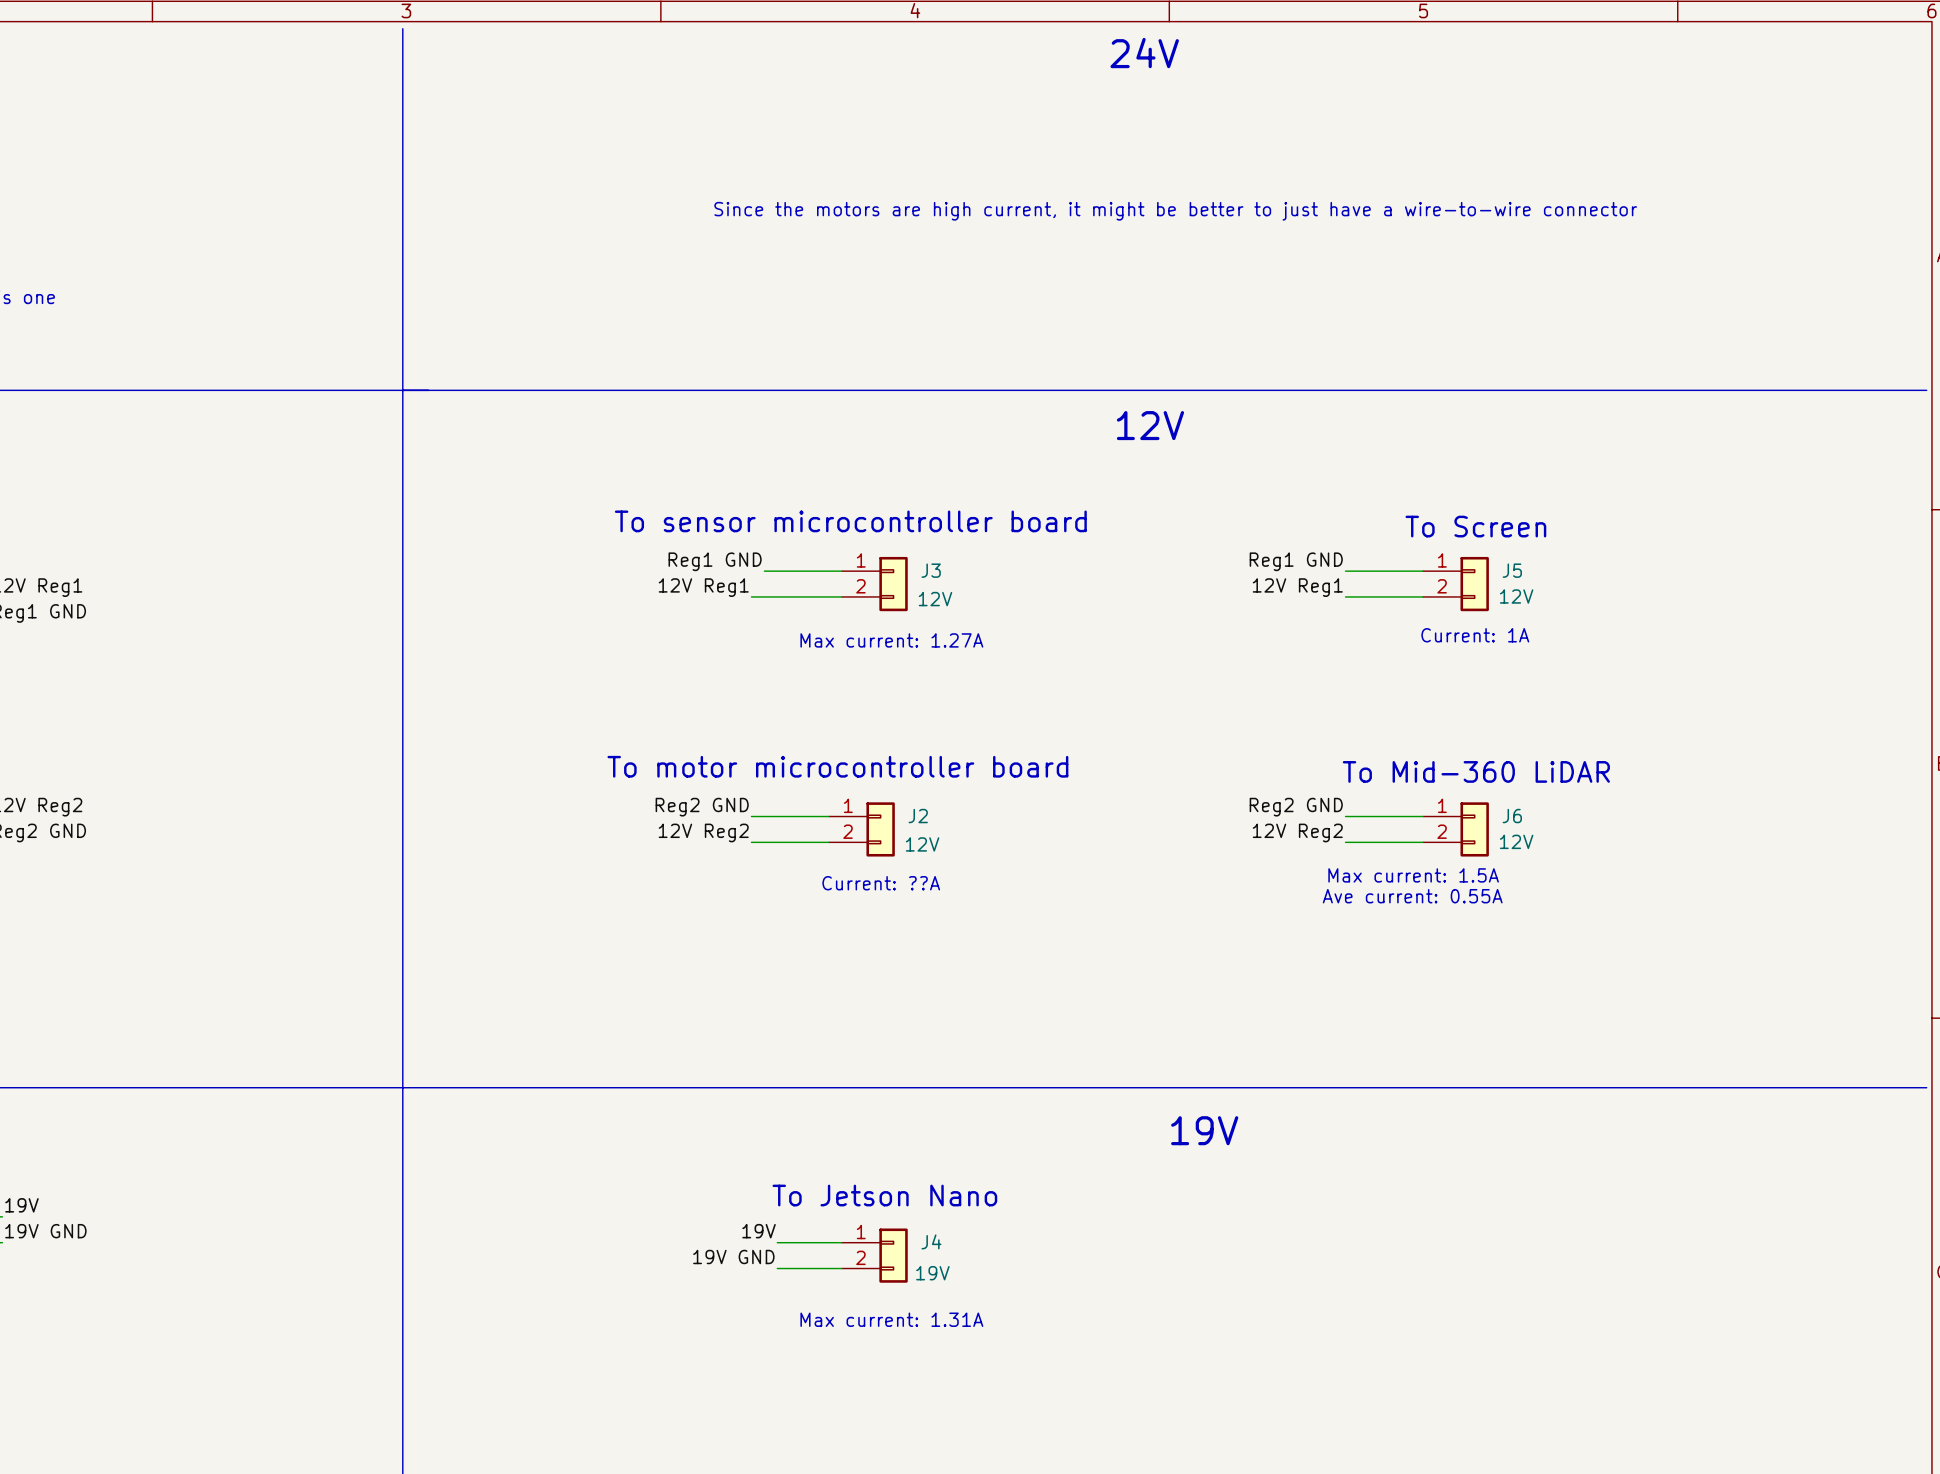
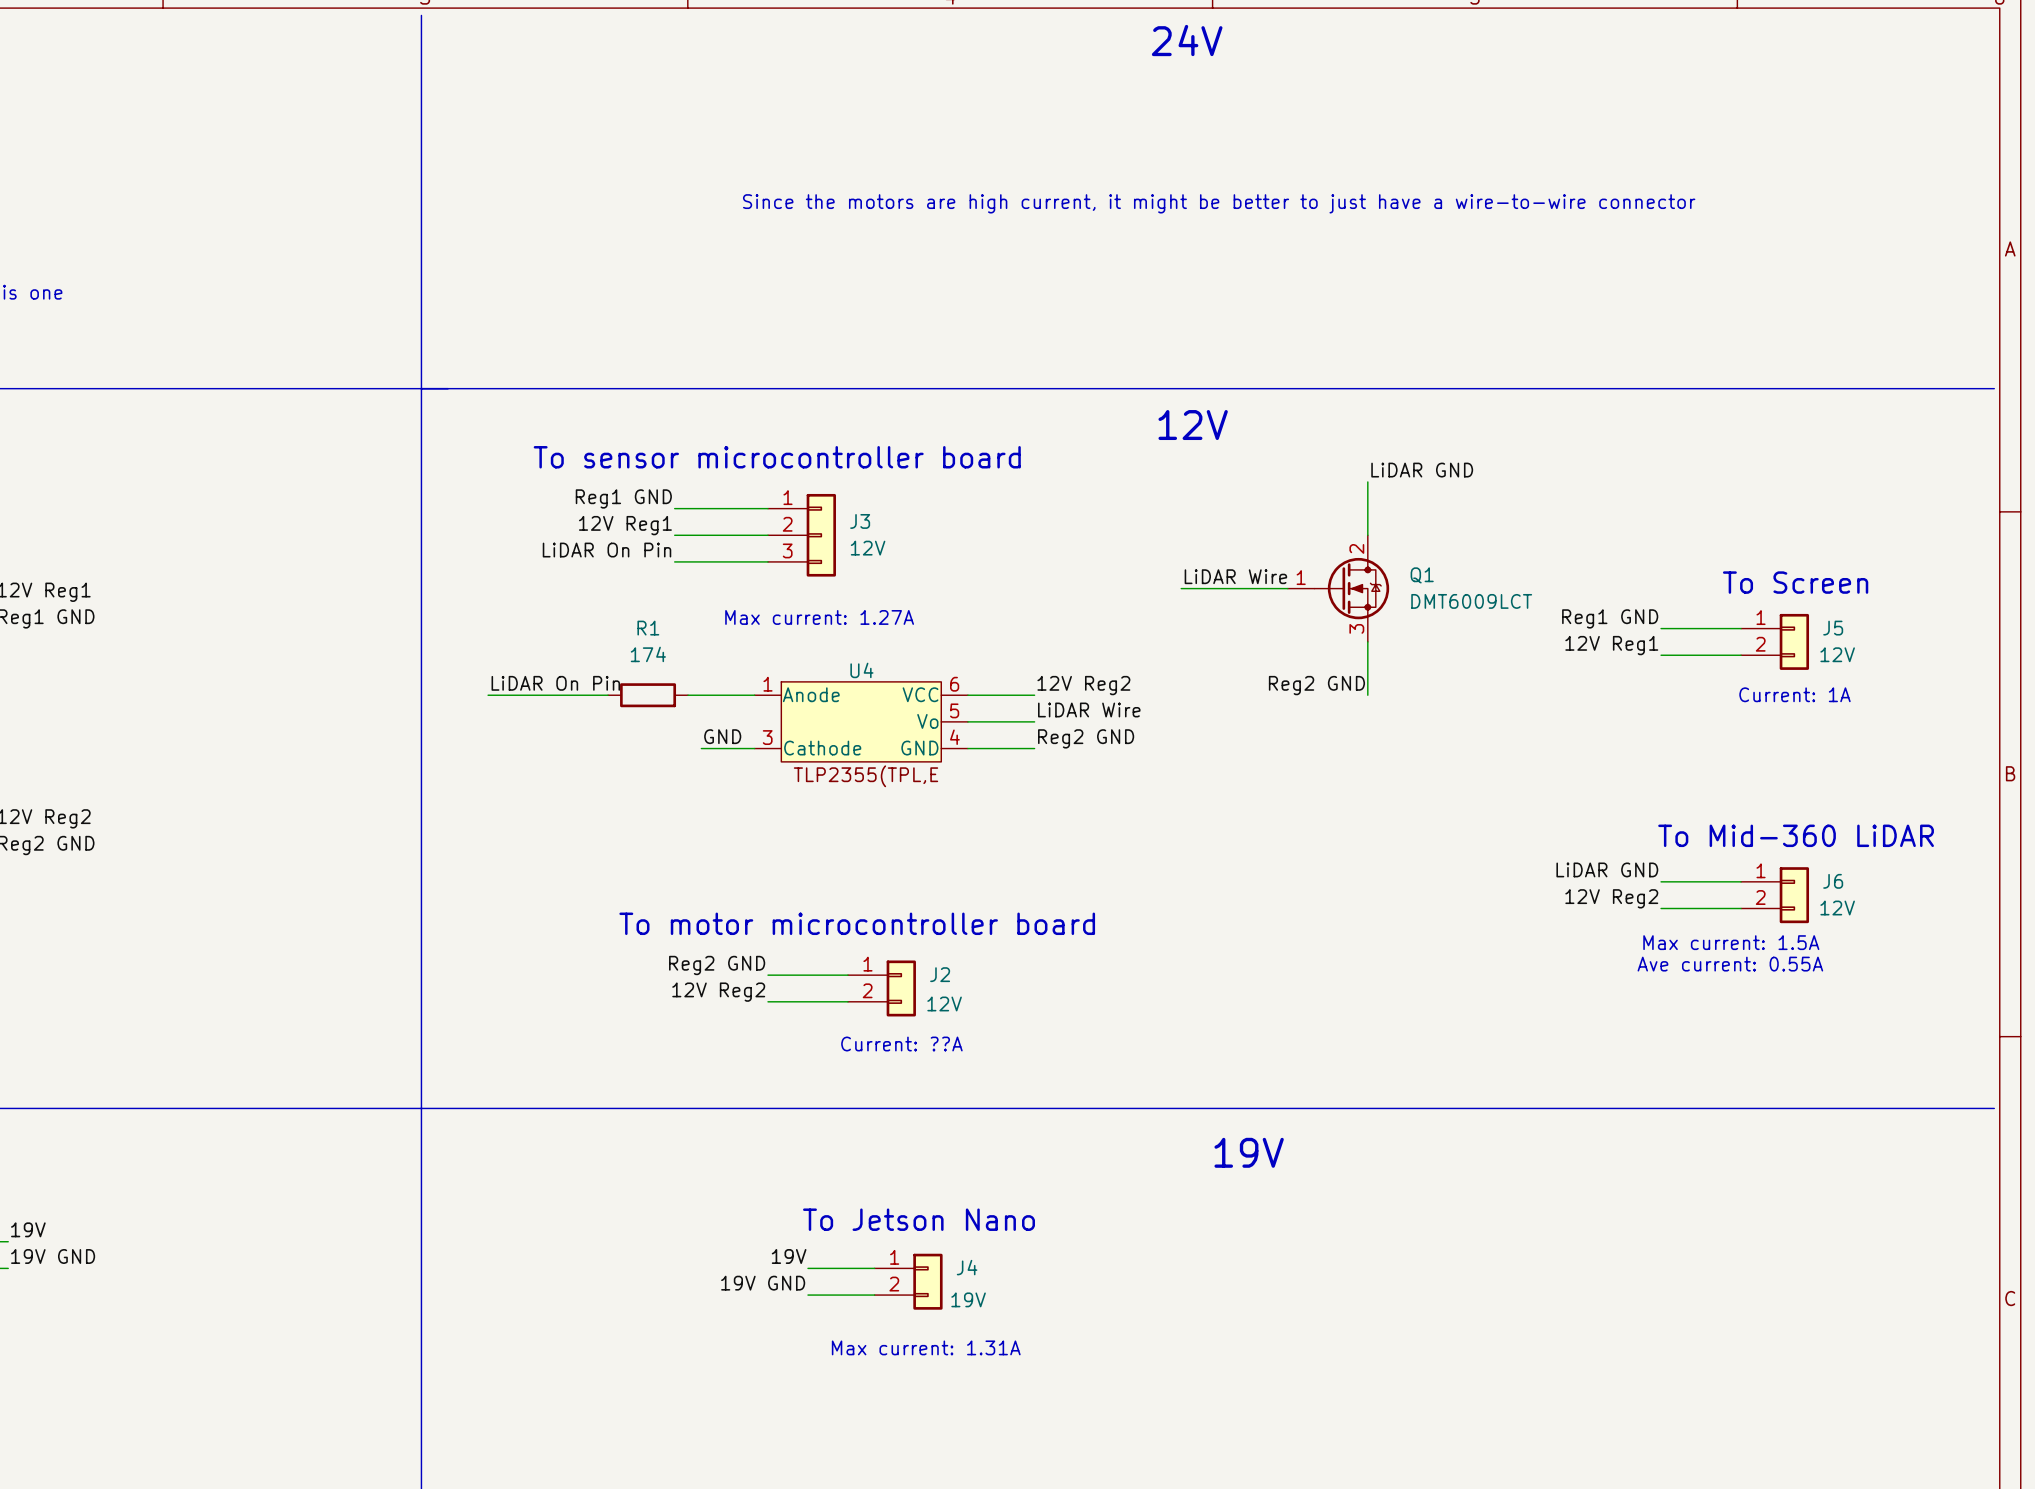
label: none -> LiDAR GND (1422, 470)
wire: none -> (1367, 481) (1367, 535)
wire: none -> (674, 508) (768, 508)
text position: To sensor microcontroller board (850, 521) -> To sensor microcontroller board (777, 457)
text: To Screen (1475, 526) -> none
wire: none -> (674, 535) (768, 535)
J3 value: none -> 12V (868, 548)
label: none -> LiDAR On Pin (607, 550)
J3 symbol: [841, 556, 908, 612] -> [768, 493, 836, 577]
label position: Reg1 GND (715, 561) -> Reg1 GND (623, 498)
label: Reg1 GND (1296, 561) -> none
wire: (764, 571) (841, 571) -> none
wire: (1345, 571) (1423, 571) -> none
label: none -> LiDAR Wire (1235, 576)
text: none -> To Screen (1795, 582)
wire: none -> (1181, 588) (1287, 588)
Q1: none -> DMT6009LCT (1338, 588)
J5 position: (1455, 584) -> (1775, 641)
label position: 12V Reg1 (703, 587) -> 12V Reg1 (625, 525)
label: 12V Reg1 (1297, 587) -> none
wire: (751, 596) (841, 596) -> (674, 561) (768, 561)
wire: (1345, 596) (1423, 596) -> none
J3 text: 12V (935, 599) -> none
label: none -> Reg1 GND (1610, 618)
wire: none -> (1661, 628) (1741, 628)
wire: none -> (1367, 641) (1367, 695)
text: Current: 1A (1475, 635) -> none
label: none -> 12V Reg1 (1611, 645)
text position: Max current: 1.27A (891, 640) -> Max current: 1.27A (819, 617)
wire: none -> (1661, 655) (1741, 655)
label: none -> LiDAR On Pin (555, 683)
label: none -> 12V Reg2 (1083, 685)
text: none -> Current: 1A (1794, 694)
wire: none -> (488, 695) (608, 695)
R1: none -> 174 (648, 695)
wire: none -> (688, 695) (754, 695)
wire: none -> (967, 695) (1034, 695)
label: none -> LiDAR Wire (1089, 710)
U4: none -> (861, 721)
wire: none -> (967, 721) (1034, 721)
label: none -> GND (722, 736)
label: none -> Reg2 GND (1086, 738)
wire: none -> (701, 748) (754, 748)
wire: none -> (967, 748) (1034, 748)
text position: To motor microcontroller board (837, 766) -> To motor microcontroller board (857, 923)
text: To Mid-360 LiDAR (1476, 771) -> none
label: Reg2 GND (702, 807) -> none
label position: Reg2 GND (1296, 807) -> Reg2 GND (1316, 685)
wire: (751, 816) (828, 816) -> (768, 975) (847, 975)
wire: (1345, 816) (1423, 816) -> none
text: none -> To Mid-360 LiDAR (1796, 835)
J2 position: (861, 829) -> (881, 988)
J6 position: (1455, 829) -> (1775, 895)
label position: 12V Reg2 (703, 832) -> 12V Reg2 (718, 992)
label: 12V Reg2 (1297, 832) -> none
wire: (751, 842) (828, 842) -> (768, 1001) (847, 1001)
wire: (1345, 842) (1423, 842) -> none
label: none -> LiDAR GND (1607, 869)
wire: none -> (1661, 881) (1741, 881)
text: Max current: 1.5A (1413, 875) -> none
text position: Current: ??A (881, 883) -> Current: ??A (901, 1044)
label: none -> 12V Reg2 (1611, 898)
wire: none -> (1661, 908) (1741, 908)
text: Ave current: 0.55A (1412, 896) -> none
text: none -> Max current: 1.5A (1731, 942)
text: none -> Ave current: 0.55A (1730, 964)
label: none -> Reg2 GND (717, 965)

